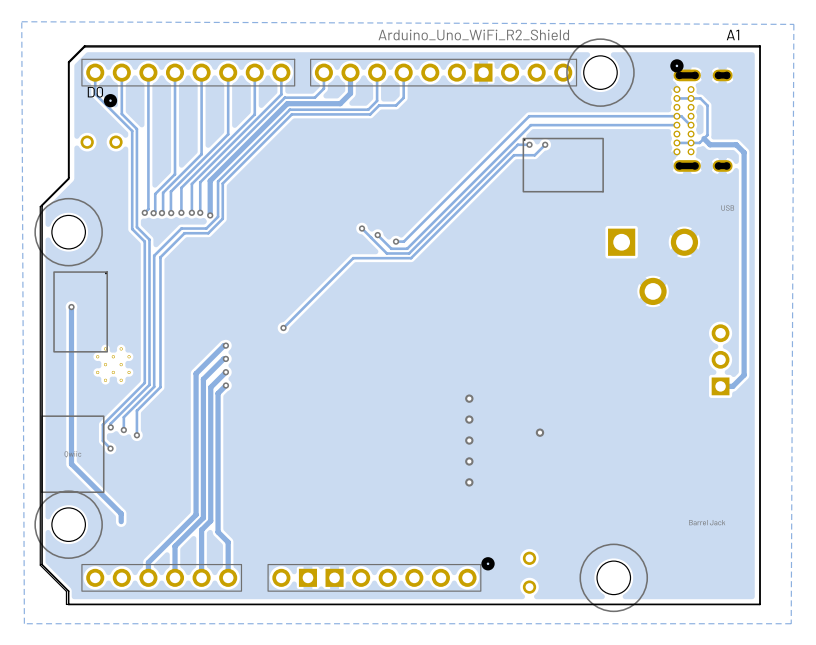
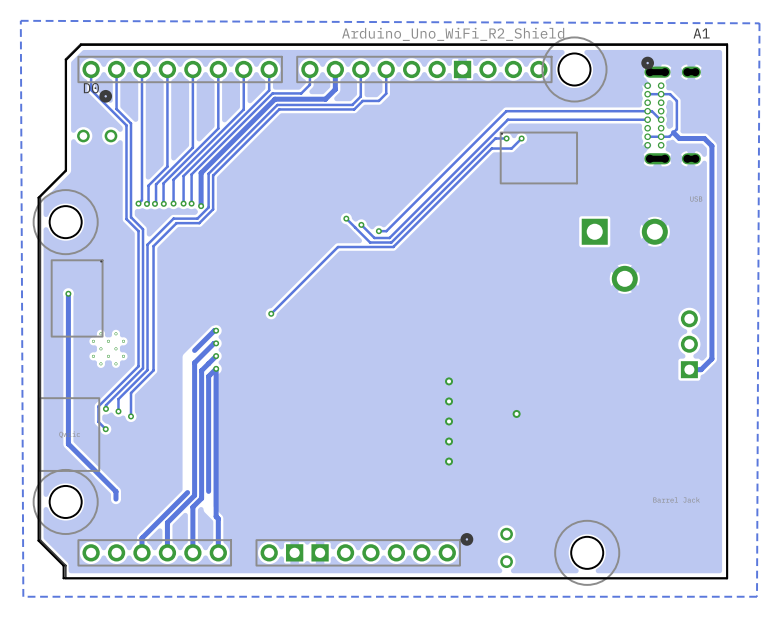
track: (203, 366) (196, 373) (196, 514) -> none
track: (218, 513) (218, 532) (225, 539) -> (216, 368) (216, 516)

